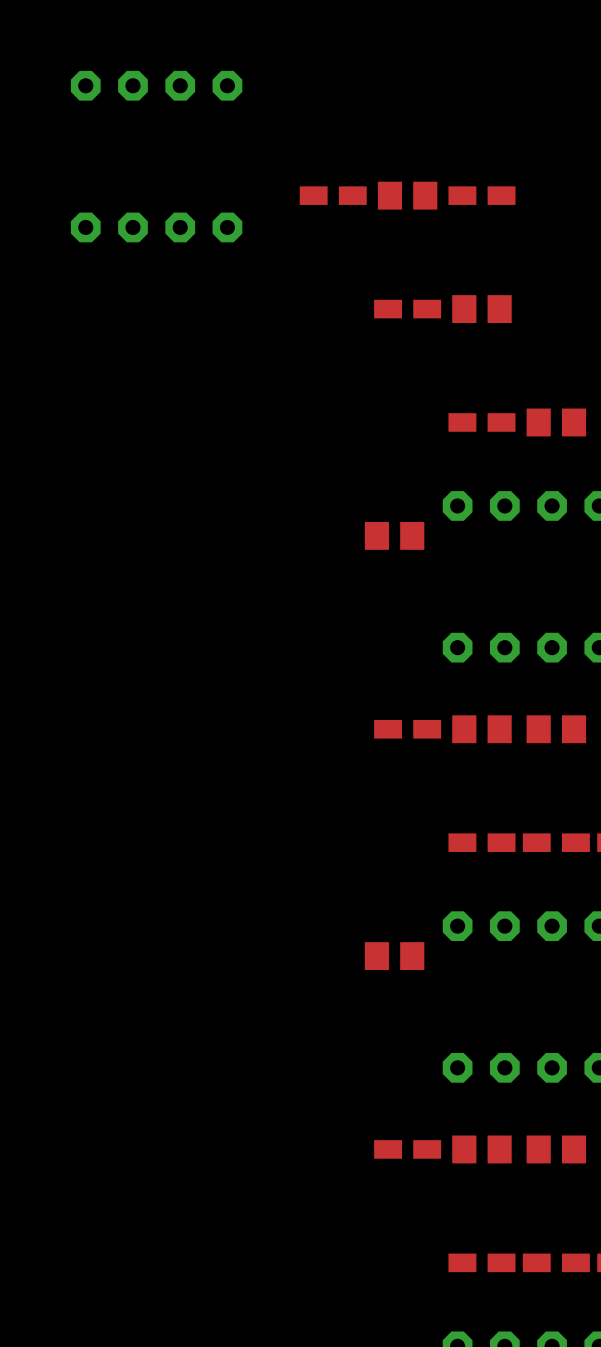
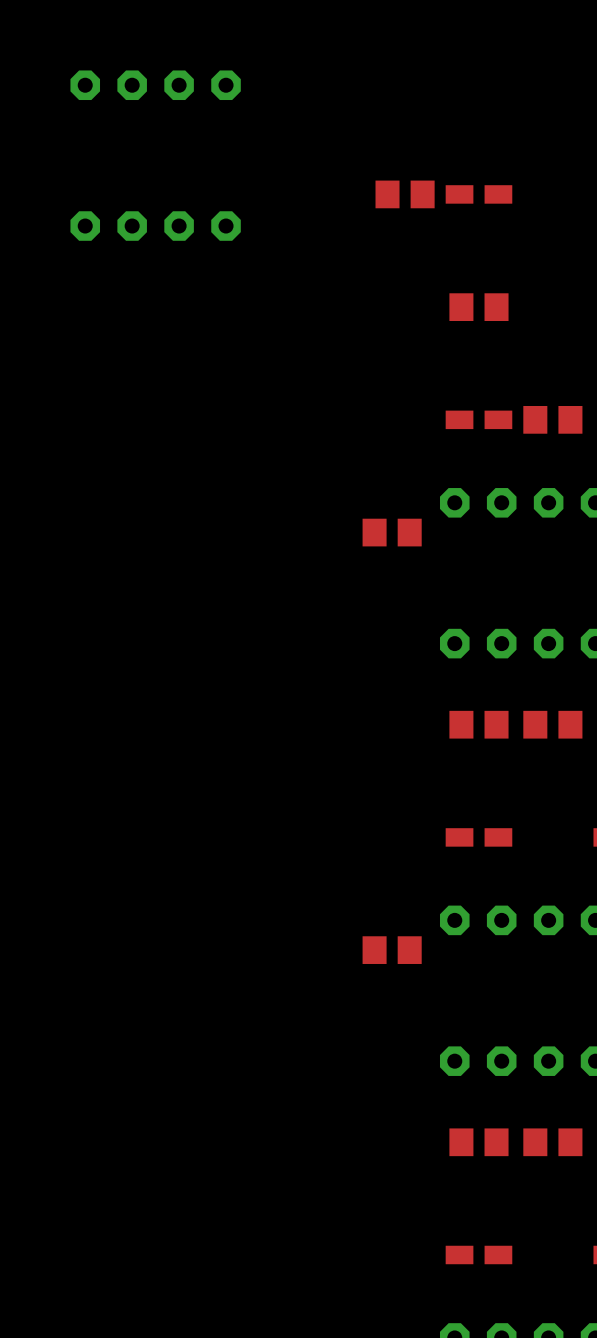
part: (333, 195) -> none
part: (407, 309) -> none
part: (407, 729) -> none
part: (556, 842) -> none
part: (407, 1149) -> none
part: (556, 1262) -> none

